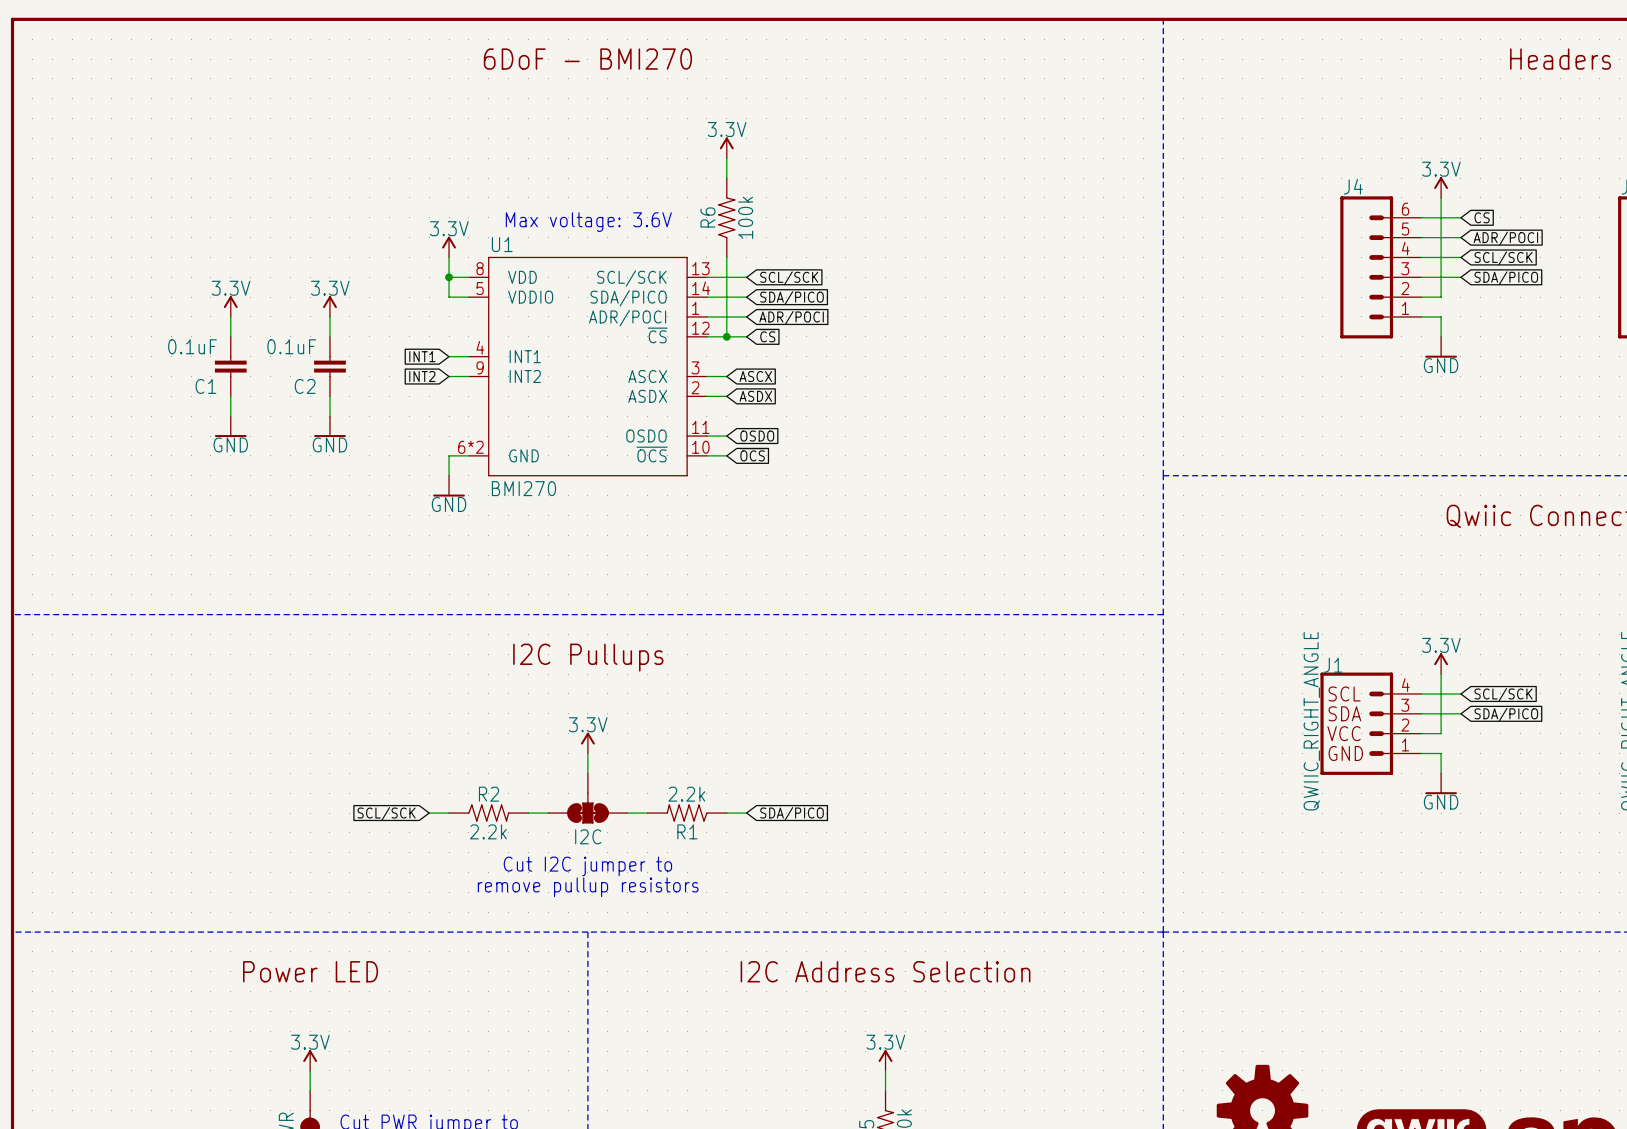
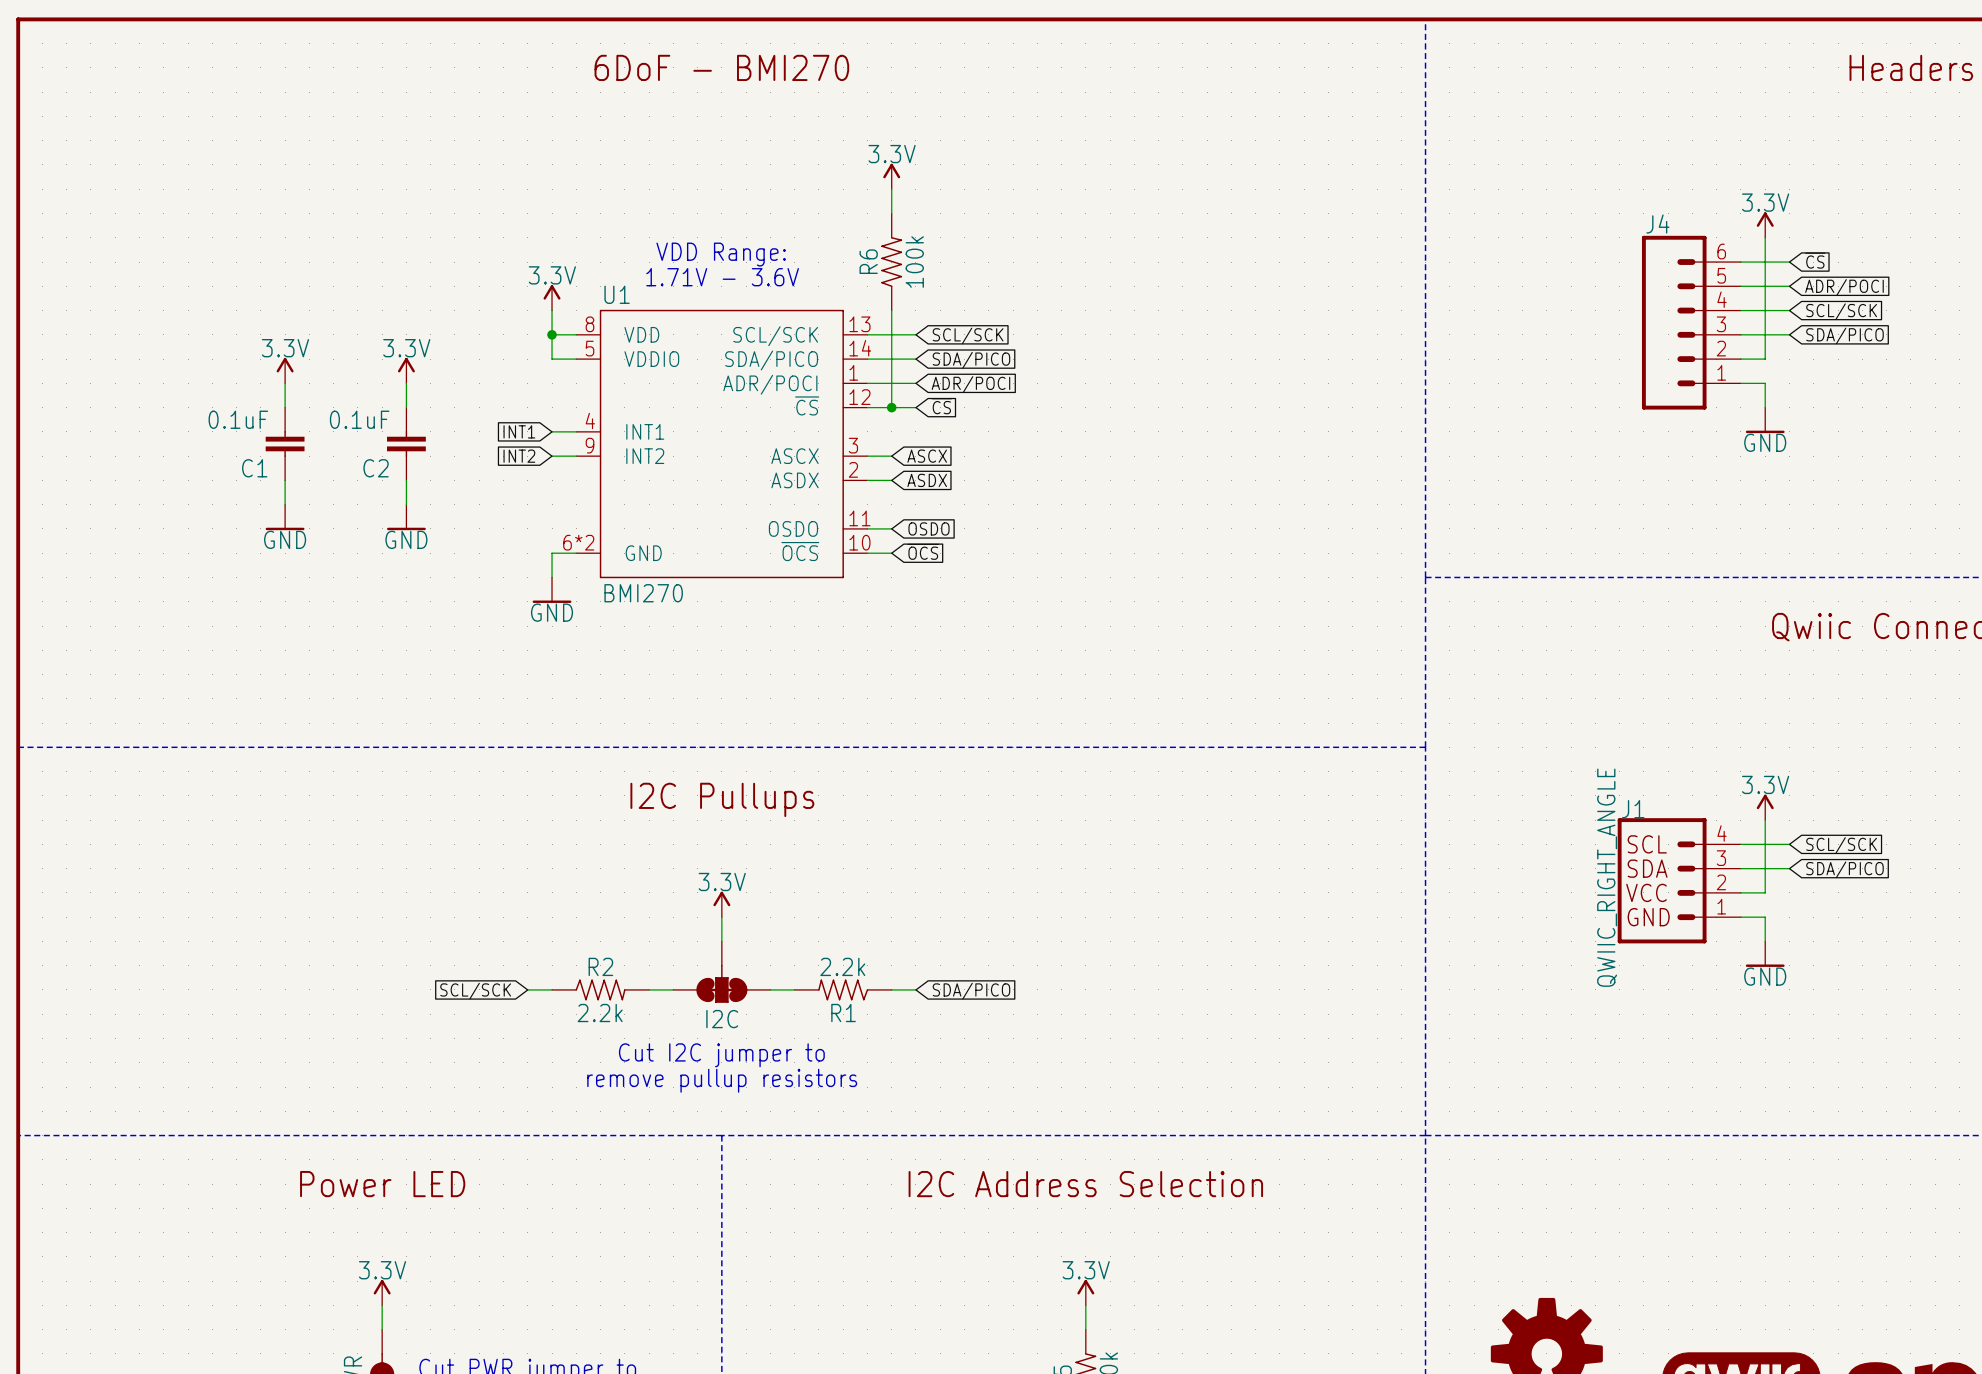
text: none -> VDD Range: (721, 254)
text: Max voltage: 3.6V (588, 222) -> none
text: none -> 1.71V - 3.6V (722, 277)

